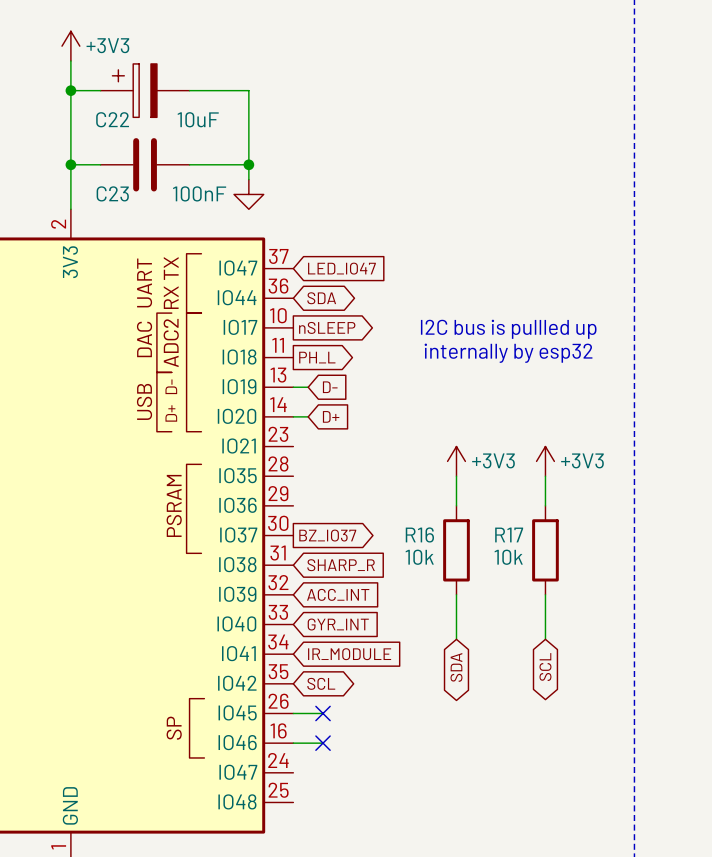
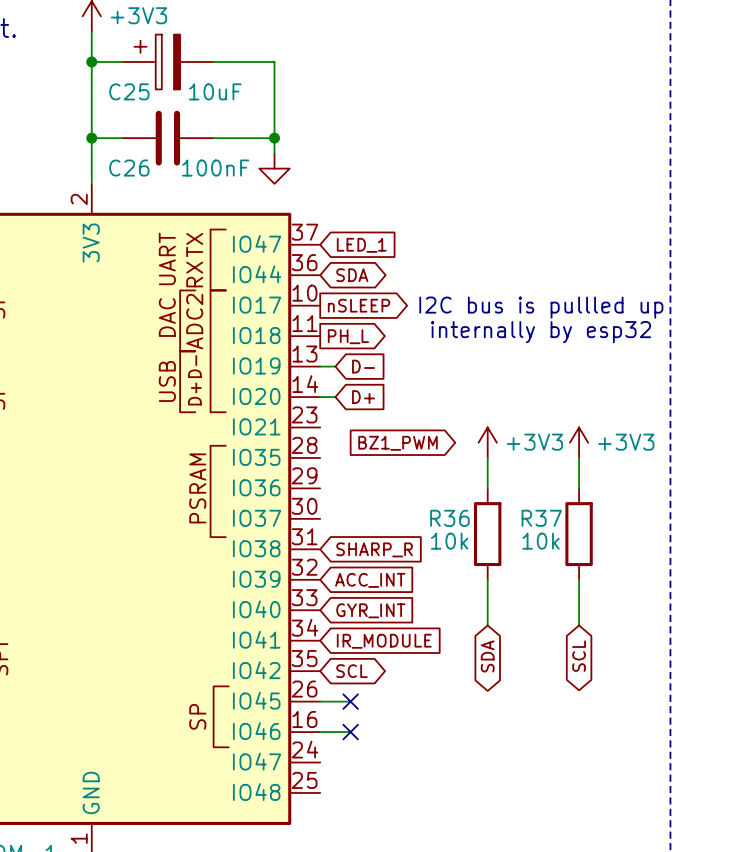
C22 name: C22 (112, 119) -> C25 (129, 91)
C23 name: C23 (112, 193) -> C26 (129, 168)
global label: LED_IO47 (341, 268) -> LED_1 (361, 245)
global label: none -> BZ1_PWM (398, 443)
R16 name: R16 (419, 534) -> R36 (449, 518)
R17 name: R17 (509, 534) -> R37 (541, 518)
global label: BZ_IO37 (327, 535) -> none

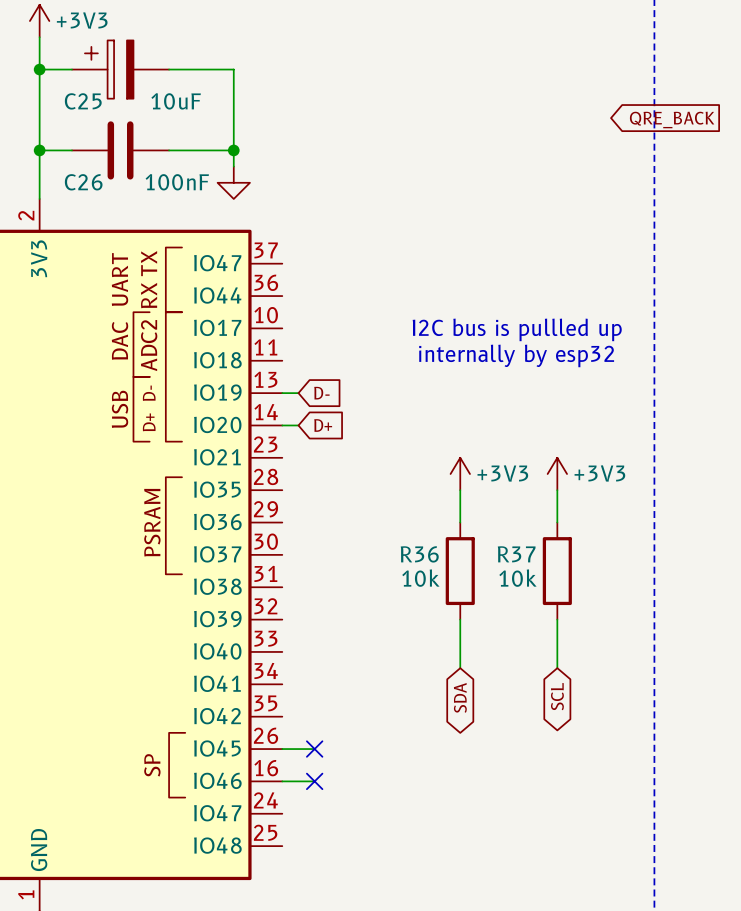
global label: none -> QRE_BACK (672, 119)
global label: LED_1 (361, 245) -> none
global label: SDA (352, 275) -> none
global label: nSLEEP (359, 305) -> none
global label: PH_L (348, 336) -> none
global label: BZ1_PWM (398, 443) -> none
global label: SHARP_R (374, 549) -> none
global label: ACC_INT (370, 580) -> none
global label: GYR_INT (370, 610) -> none
global label: IR_MODULE (384, 641) -> none
global label: SCL (352, 671) -> none

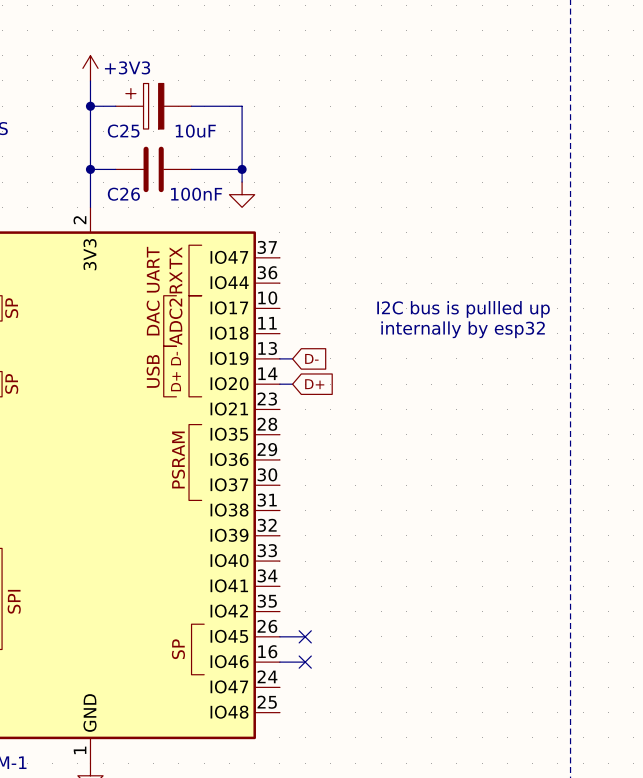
global label: QRE_BACK (672, 119) -> none
power symbol: +3V3 (460, 474) -> none
power symbol: +3V3 (557, 474) -> none
wire: (460, 490) (460, 522) -> none
wire: (557, 490) (557, 522) -> none
R36: 10k (460, 571) -> none
R37: 10k (557, 571) -> none
wire: (460, 619) (460, 668) -> none
wire: (557, 619) (557, 668) -> none
global label: SCL (557, 696) -> none
global label: SDA (460, 697) -> none

